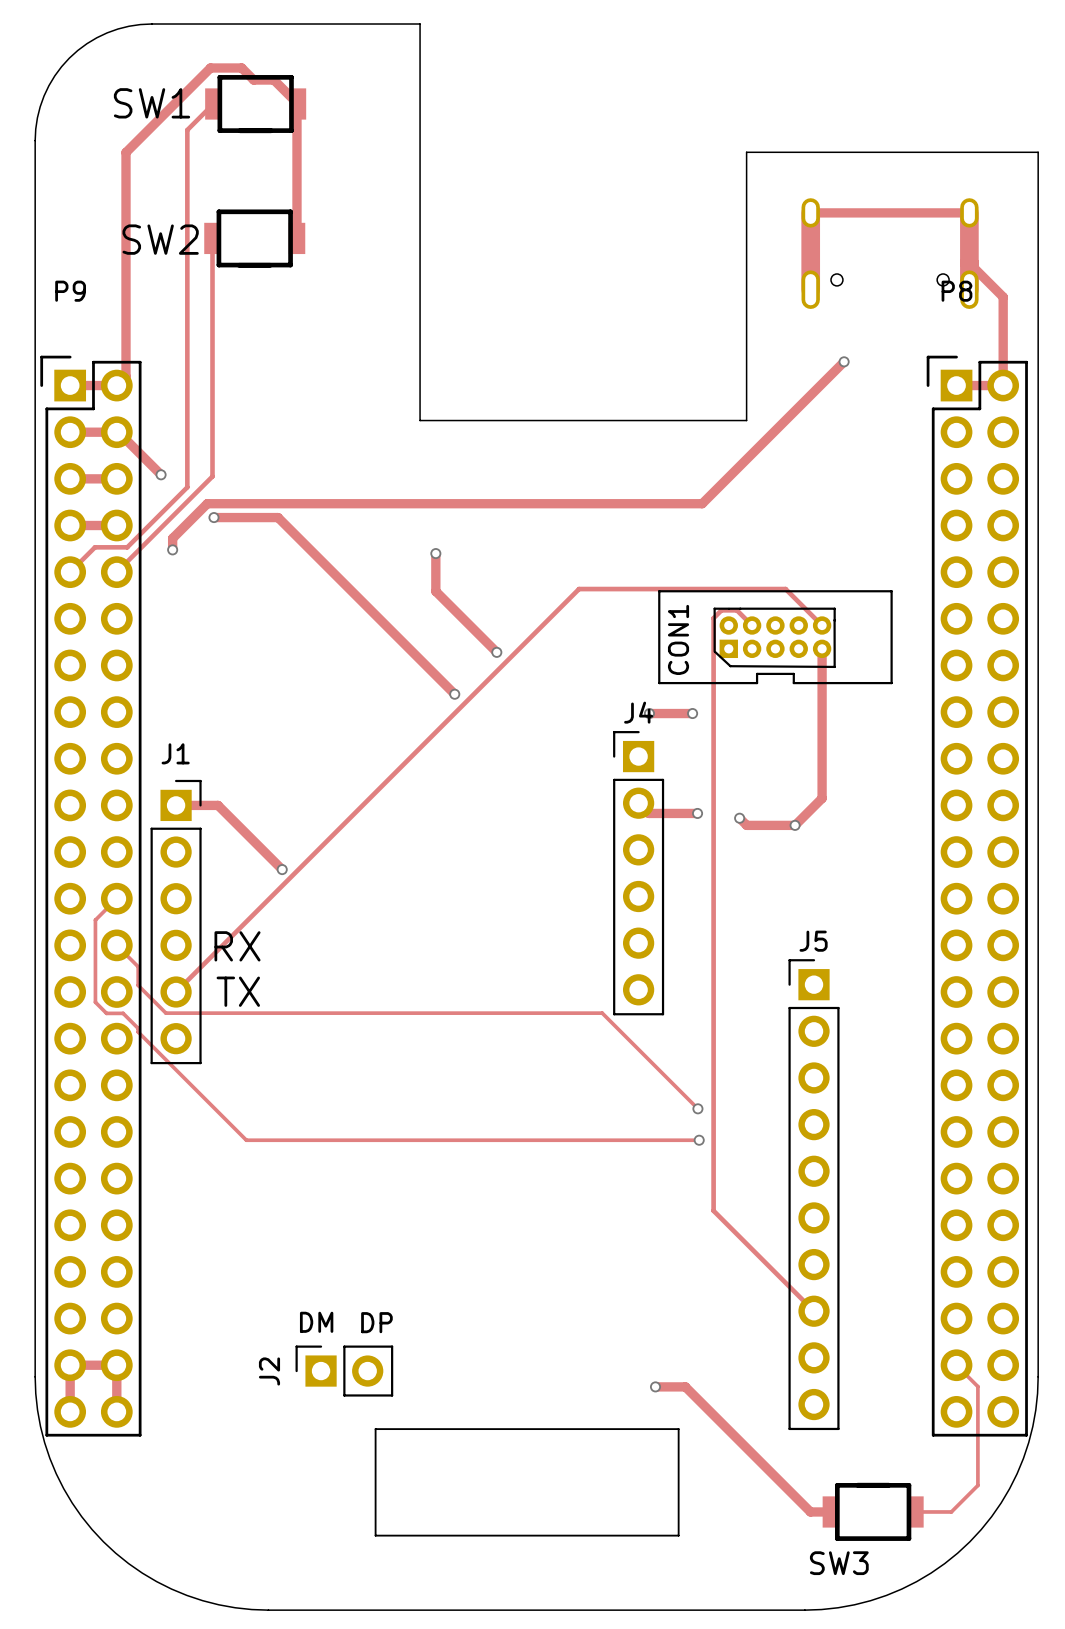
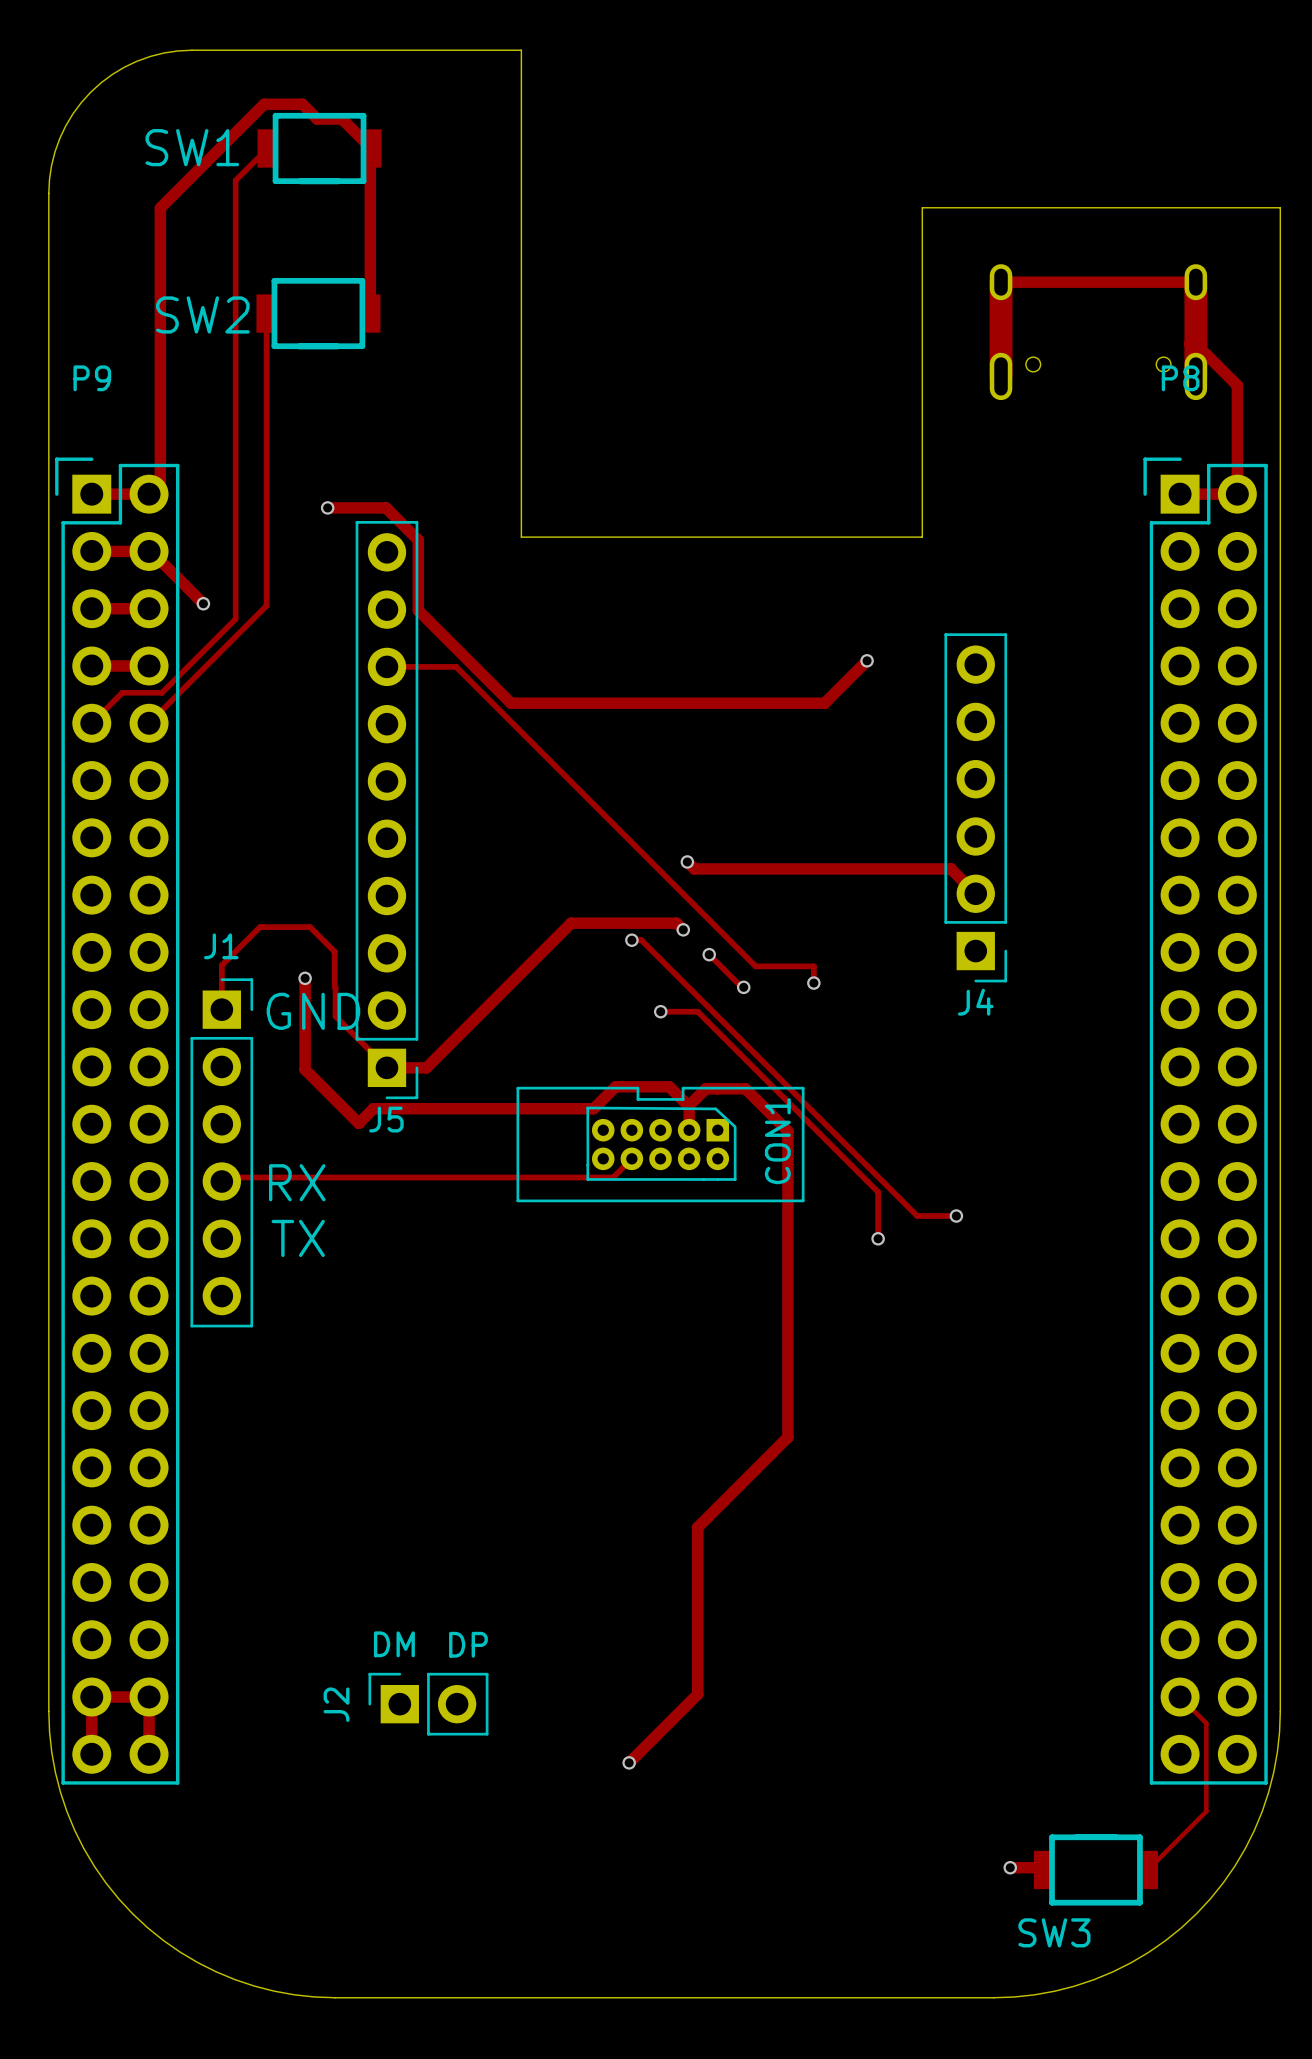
track: (844, 361) (702, 503) (207, 503) (172, 538) (172, 549) -> none
via: (844, 361) -> none
track: none -> (327, 507) (386, 507) (418, 540) (418, 610) (511, 703) (824, 703) (867, 660)
via: none -> (327, 507)
track: (213, 517) (278, 517) (454, 694) -> none
via: (213, 517) -> none
via: none -> (867, 660)
track: none -> (386, 666) (456, 666) (755, 966) (813, 966) (813, 983)
via: (172, 549) -> none
track: (435, 553) (435, 591) (496, 652) -> none
via: (435, 553) -> none
track: (752, 625) (736, 610) (721, 610) (713, 618) (713, 1210) (814, 1311) -> none
track: (822, 625) (785, 589) (579, 589) (176, 992) -> none
CON1 rotation: 0° (775, 637) -> 180° (660, 1144)
CON1 position: (775, 637) -> (660, 1144)
track: (822, 648) (822, 798) (795, 825) (746, 825) (739, 818) -> none
via: (496, 652) -> none
track: none -> (687, 861) (694, 868) (950, 868) (975, 893)
via: none -> (687, 861)
via: (454, 694) -> none
track: (649, 713) (692, 713) -> none
via: (649, 713) -> none
via: (692, 713) -> none
via: none -> (683, 929)
track: none -> (631, 940) (641, 940) (917, 1216) (956, 1216)
via: none -> (631, 940)
track: none -> (709, 954) (743, 987)
via: none -> (709, 954)
track: none -> (305, 978) (305, 1069) (358, 1123) (373, 1108) (593, 1108) (615, 1086) (669, 1086) (689, 1106)
via: none -> (813, 983)
via: none -> (743, 987)
track: (638, 803) (648, 813) (697, 813) -> none
track: (176, 805) (218, 805) (282, 869) -> (221, 1009) (221, 965) (260, 927) (310, 927) (334, 951) (335, 1016) (386, 1067) (426, 1067) (571, 923) (676, 923) (683, 929)
text: none -> GND (313, 1011)
track: none -> (660, 1011) (697, 1011) (878, 1192) (878, 1238)
via: none -> (660, 1011)
via: (697, 813) -> none
via: (739, 818) -> none
via: (795, 825) -> none
via position: (282, 869) -> (305, 978)
J4 rotation: 0° (638, 873) -> 180° (975, 807)
J4 position: (638, 873) -> (975, 807)
track: (116, 898) (95, 920) (95, 1002) (106, 1013) (123, 1013) (138, 1028) (138, 1032) (246, 1140) (699, 1140) -> none
track: none -> (689, 1130) (689, 1105) (705, 1088) (745, 1088) (787, 1131) (787, 1437) (697, 1527) (697, 1694) (629, 1762)
track: none -> (631, 1158) (613, 1177) (225, 1177)
track: (116, 945) (138, 966) (138, 985) (165, 1013) (602, 1013) (697, 1108) -> none
via: none -> (956, 1216)
via: none -> (878, 1238)
via: (697, 1108) -> none
via: (699, 1140) -> none
J5 rotation: 0° (814, 1194) -> 180° (386, 810)
J5 position: (814, 1194) -> (386, 810)
track: (655, 1386) (685, 1386) (810, 1511) (830, 1511) -> none
via: (655, 1386) -> none
via: none -> (629, 1762)
board edge: (375, 1429) (678, 1429) (678, 1535) (375, 1535) (375, 1429) -> none
track: (977, 1458) (977, 1485) (951, 1511) (915, 1511) -> (1206, 1811) (1147, 1869)
track: none -> (1010, 1867) (1041, 1867) (1044, 1869)
via: none -> (1010, 1867)
SW3 position: (873, 1511) -> (1095, 1869)

